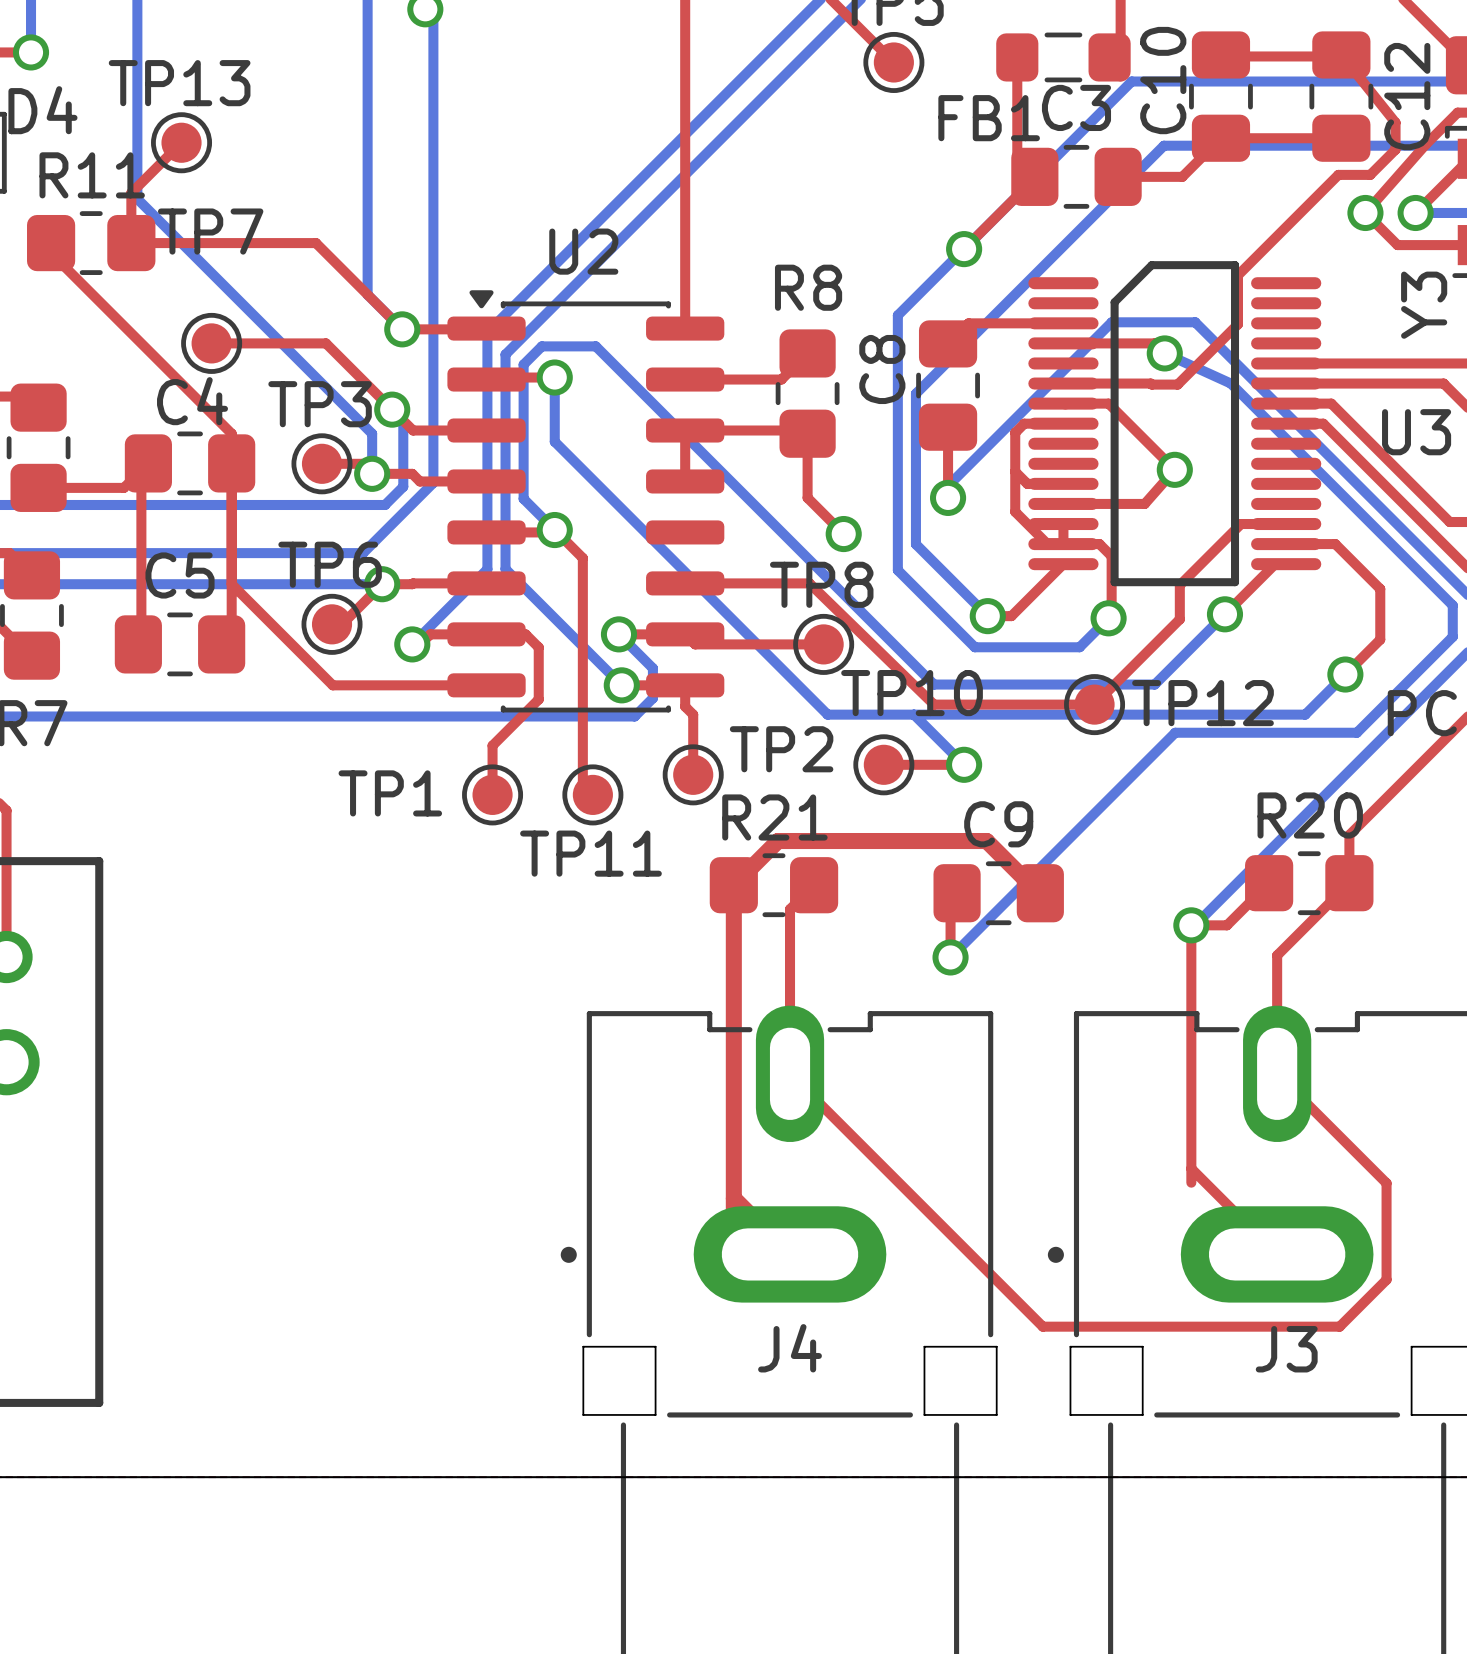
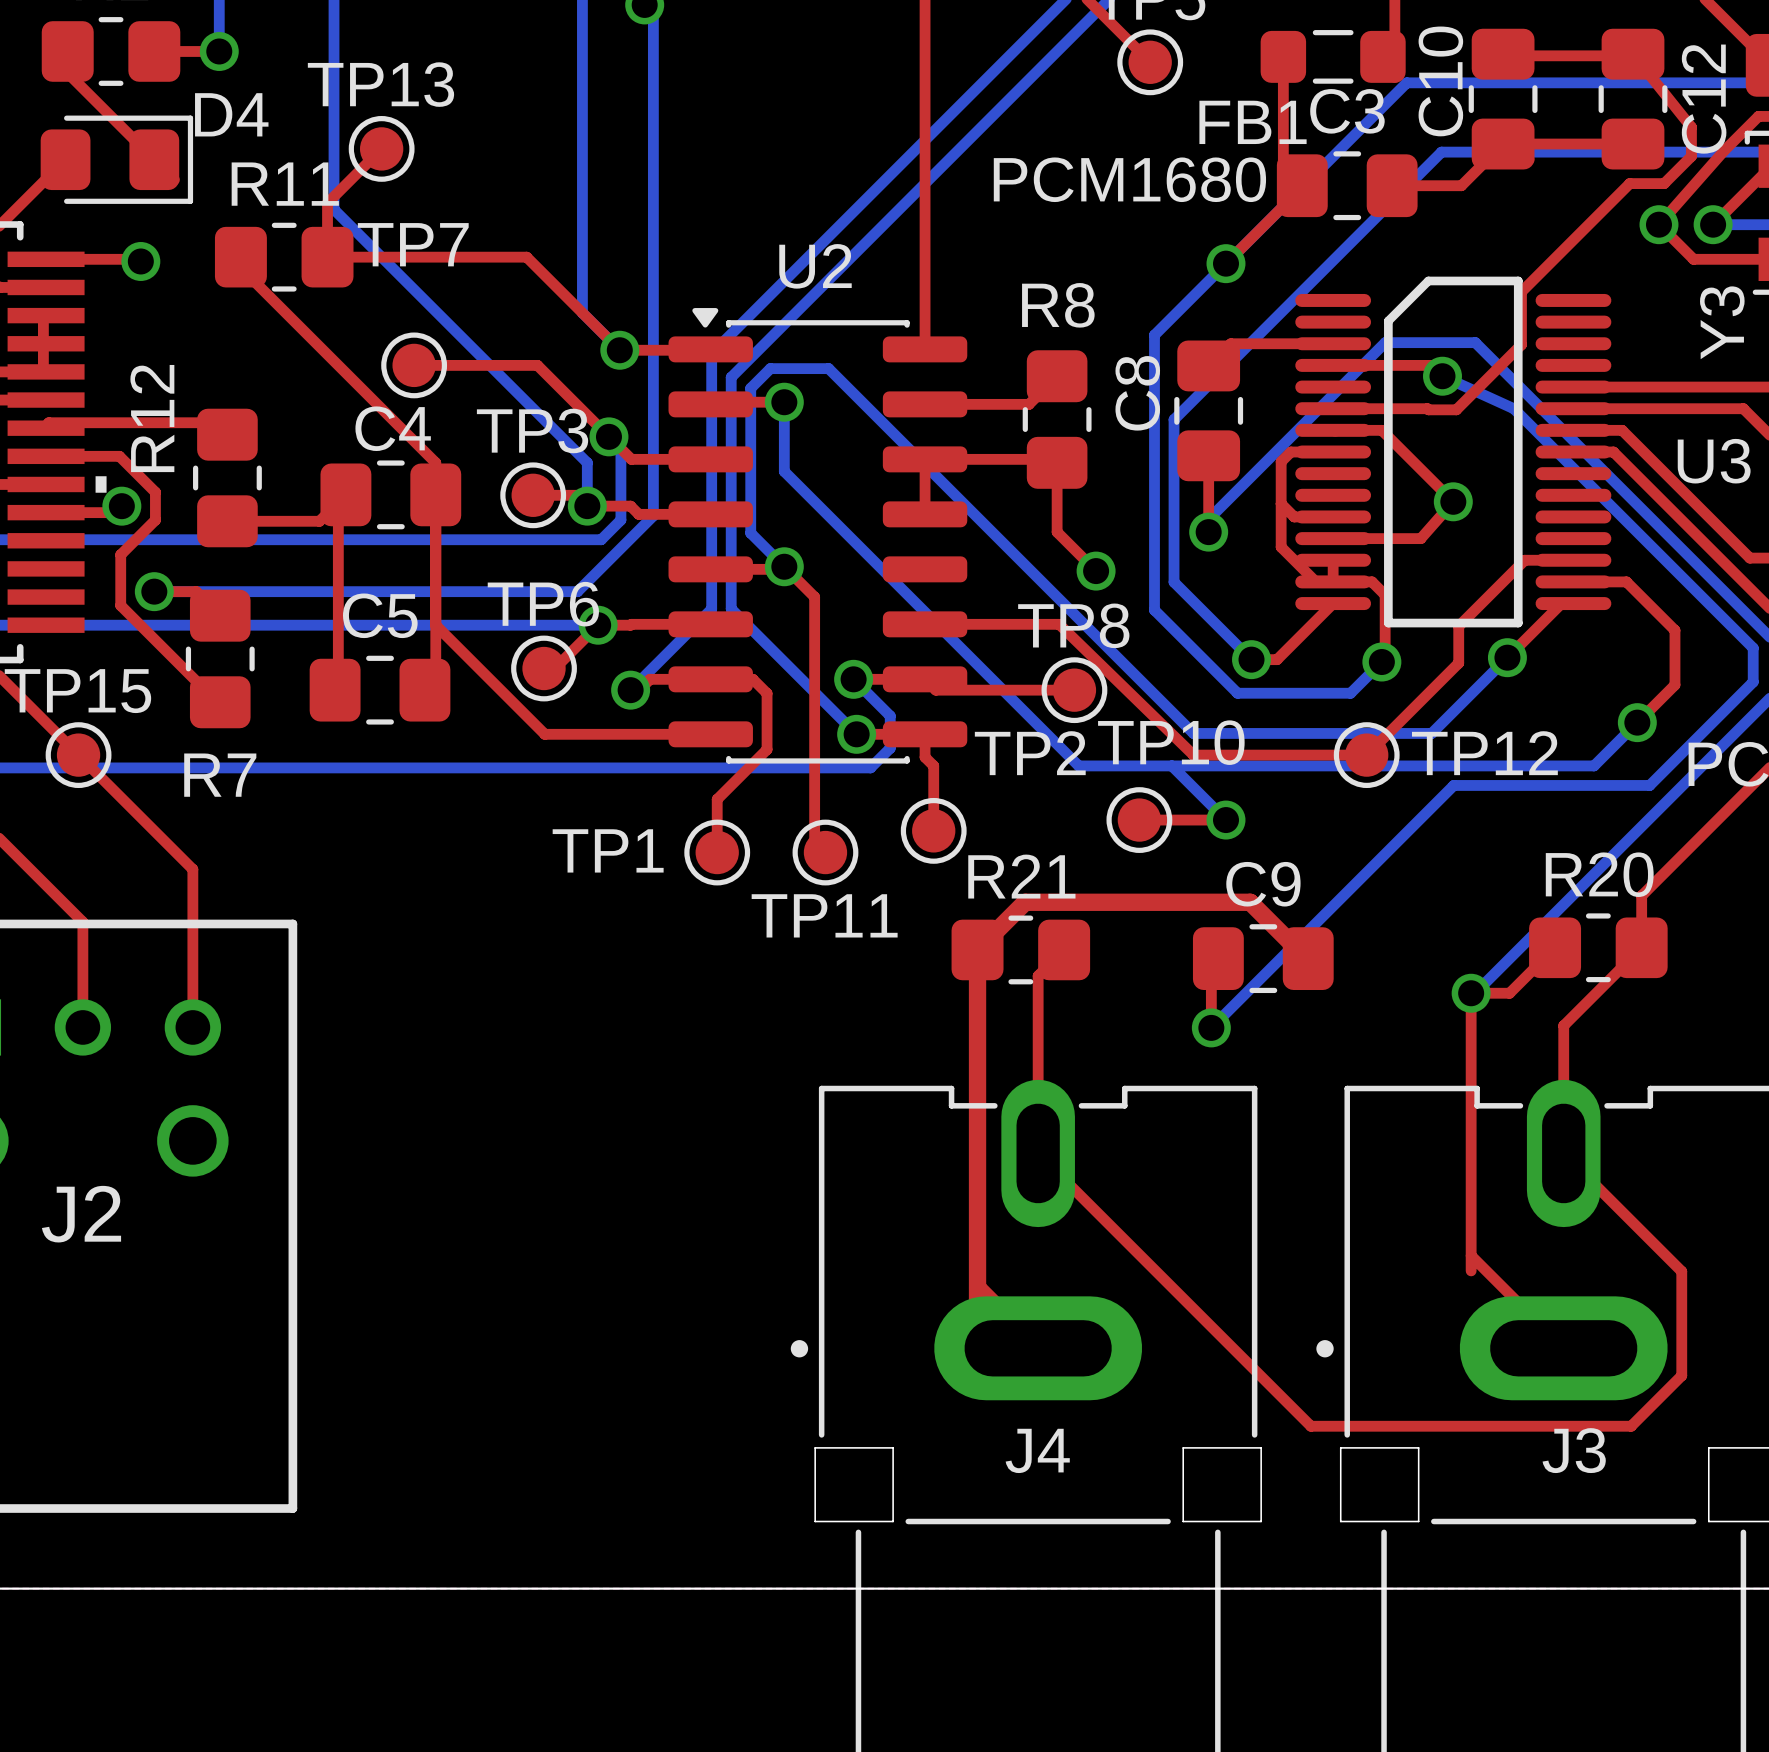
U3 text: none -> PCM1680 (1129, 179)
TP2 name position: TP2 (781, 749) -> TP2 (1030, 753)

